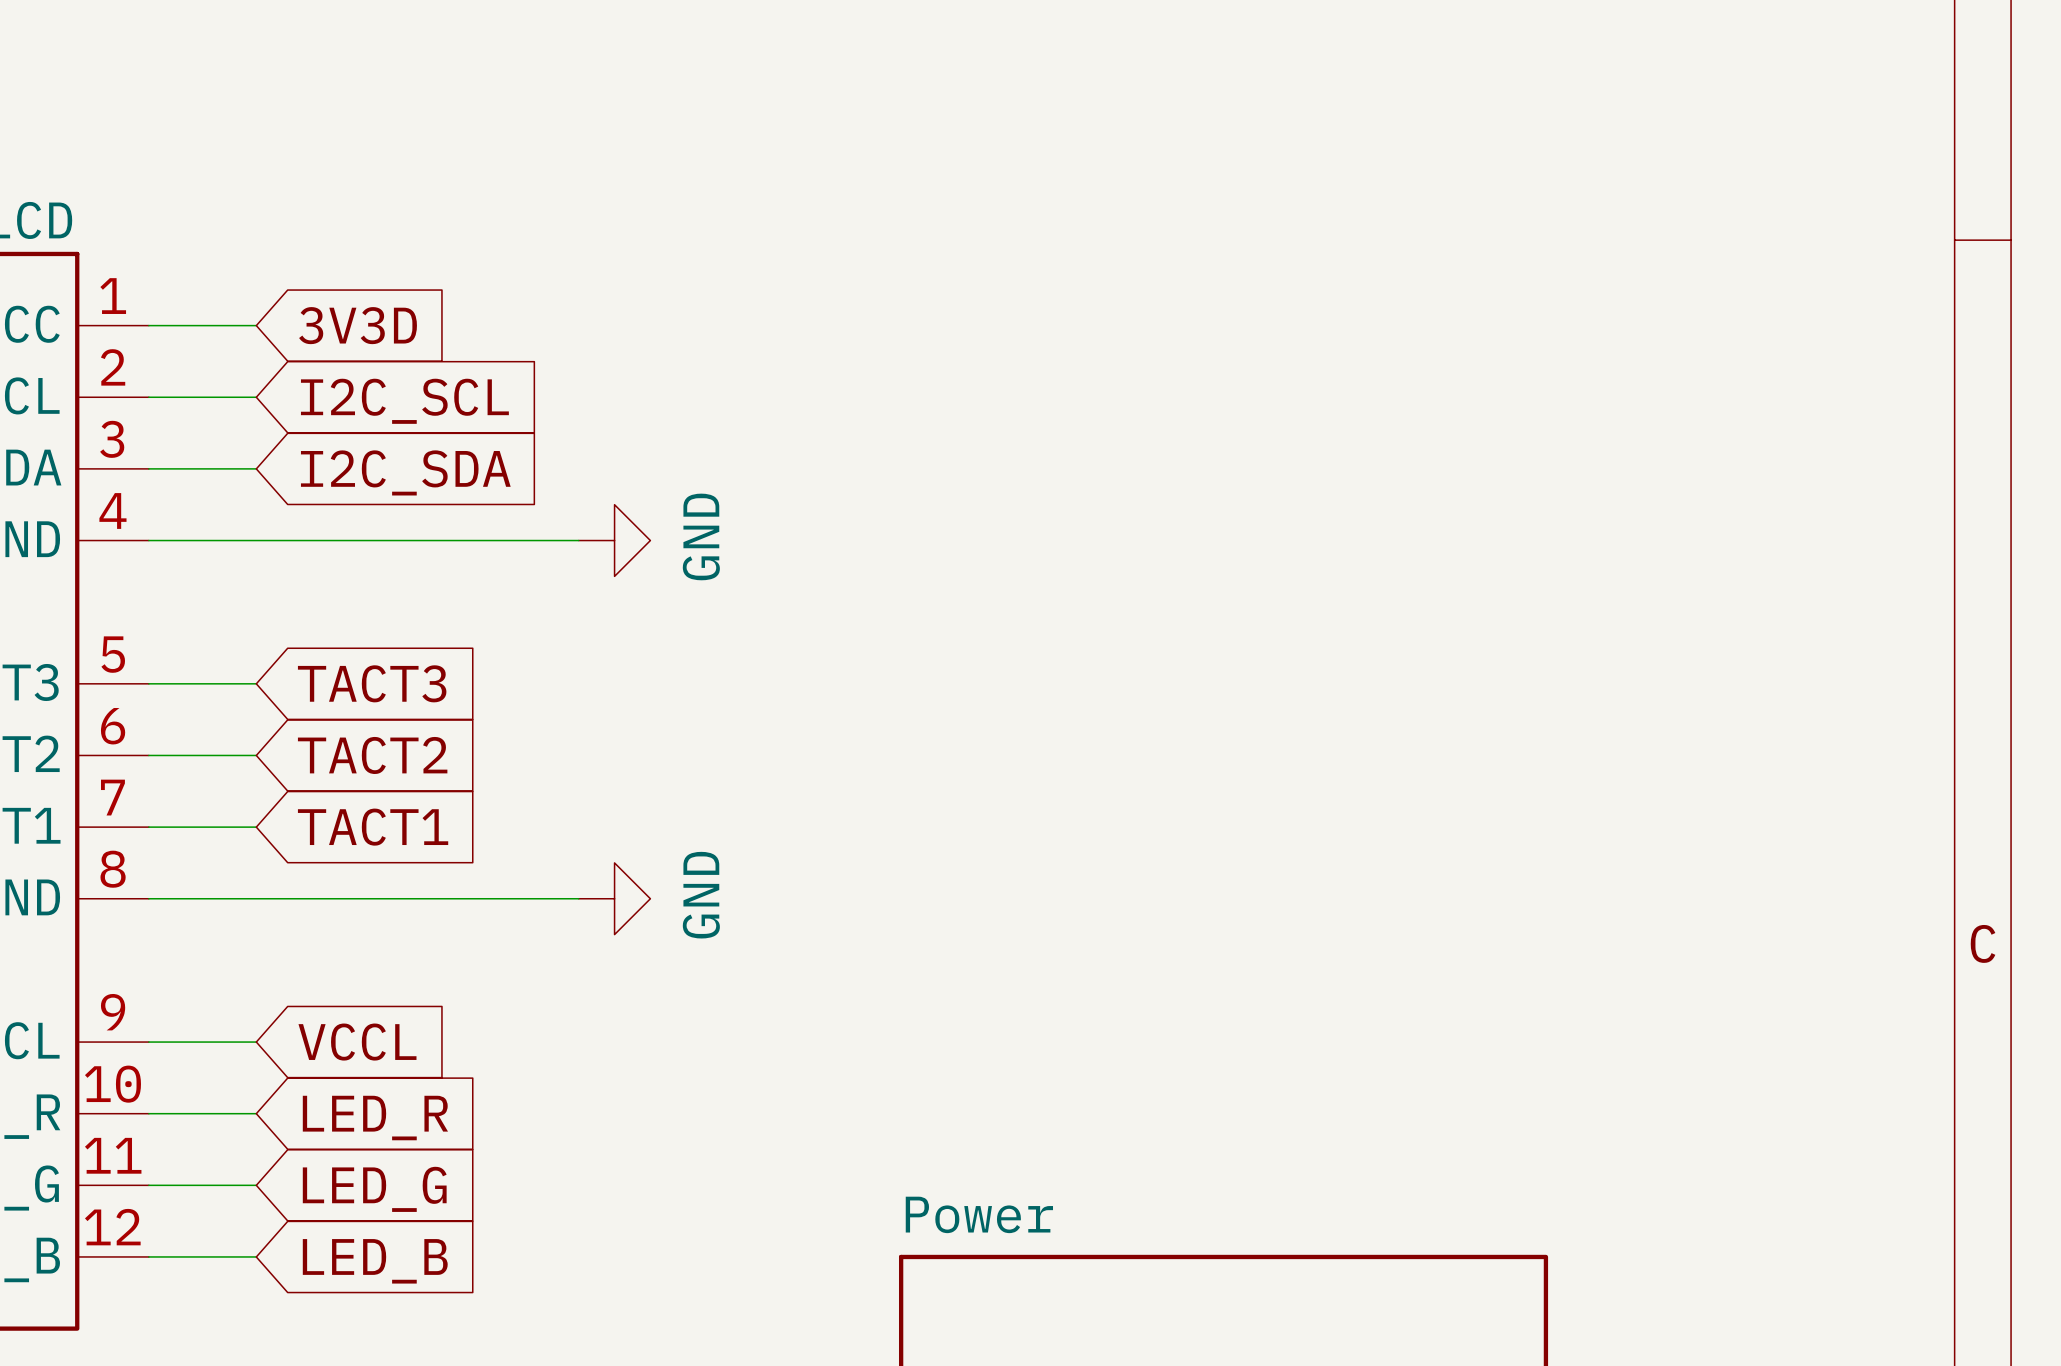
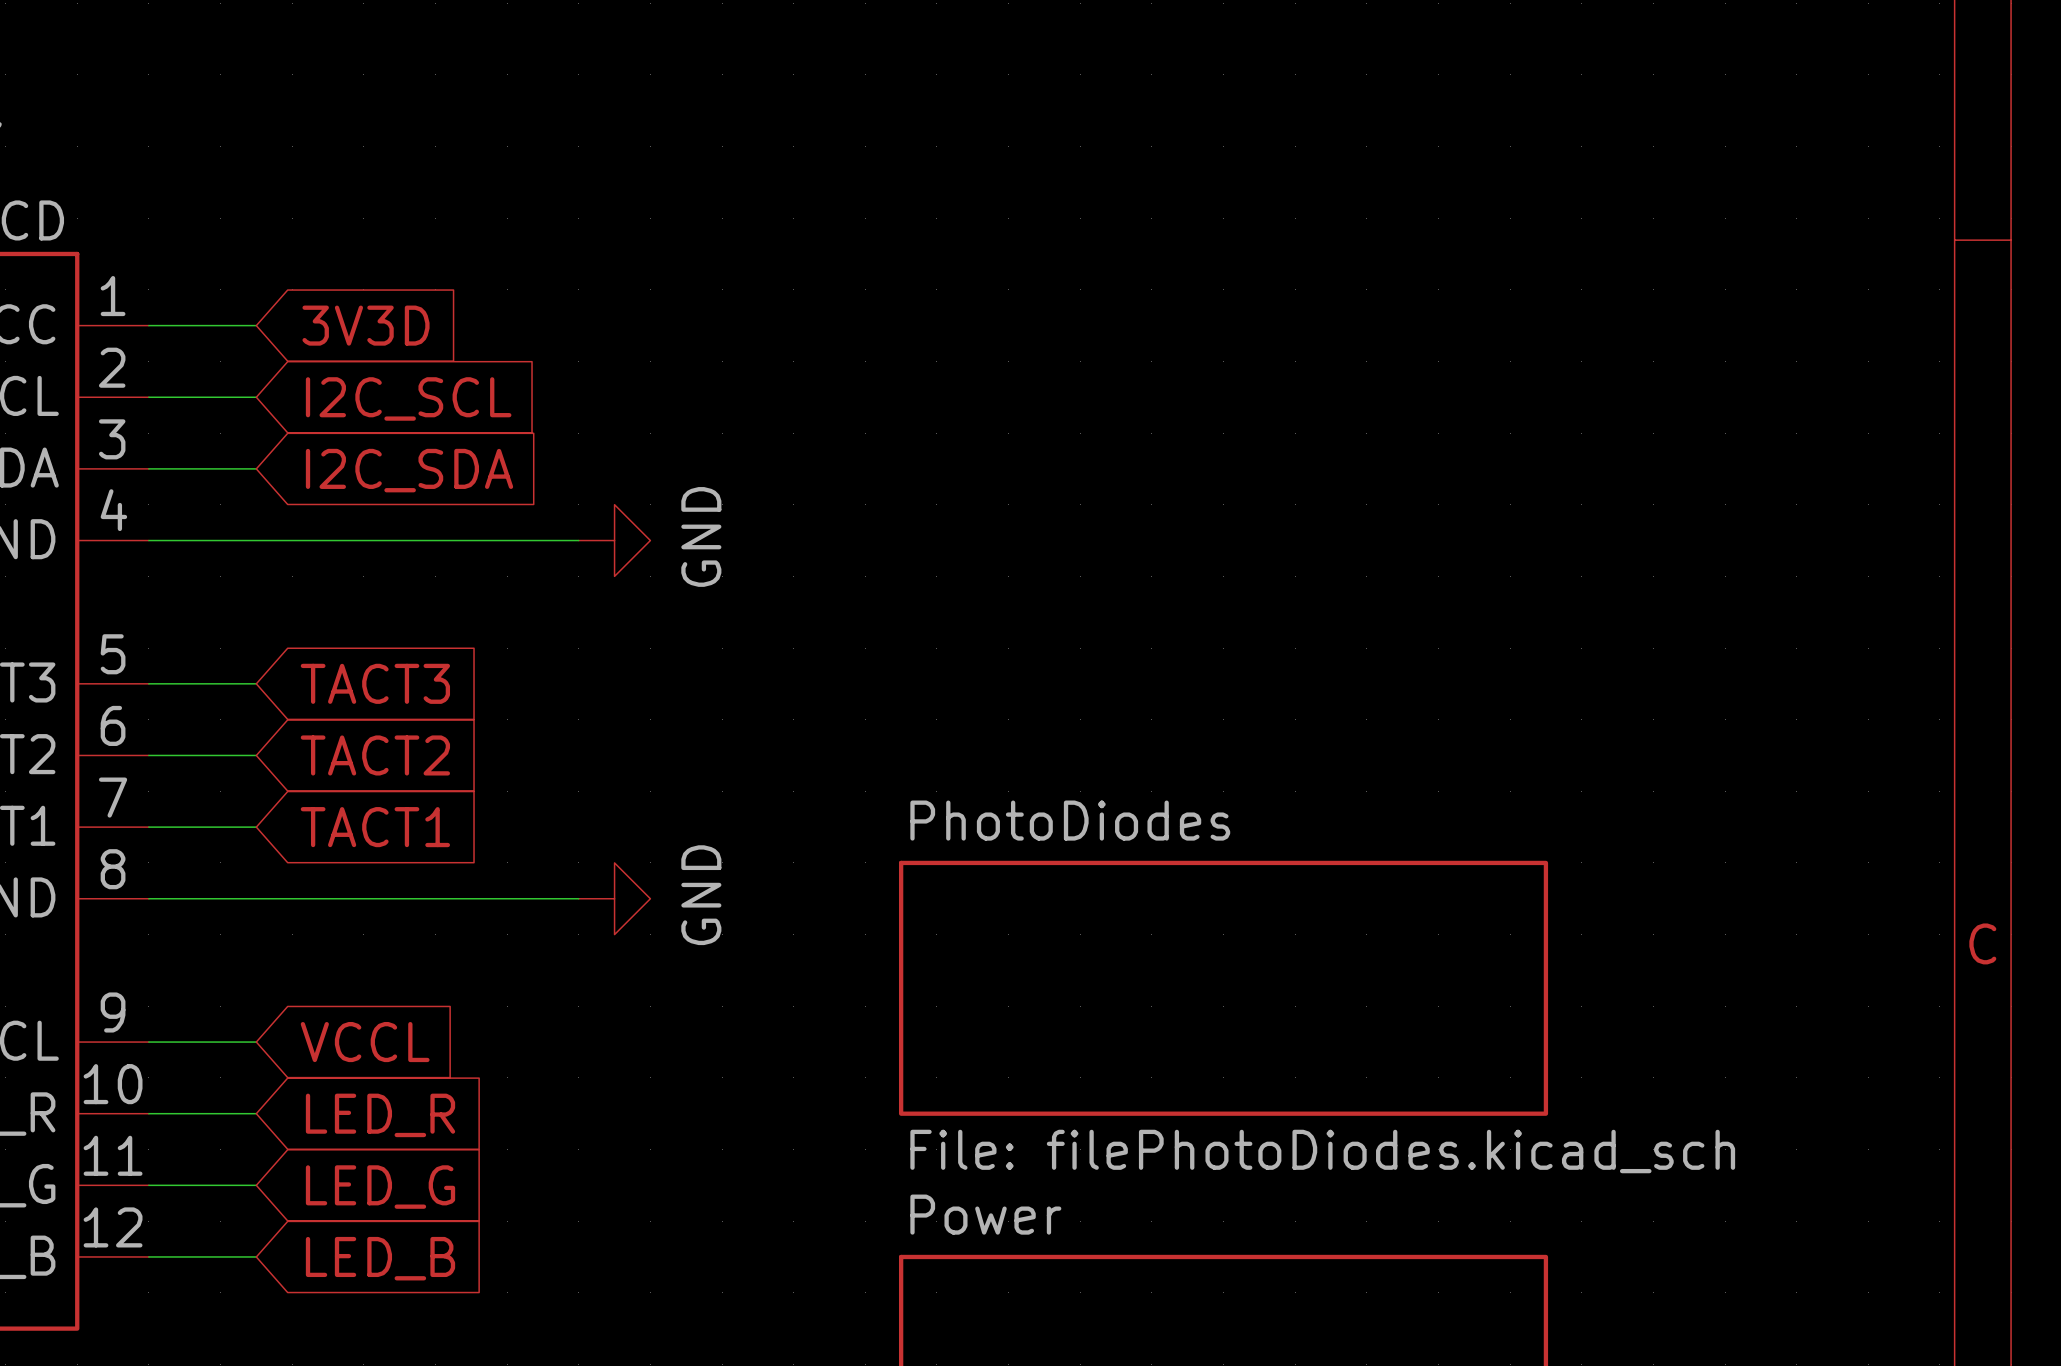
sheet PhotoDiodes: none -> File: filePhotoDiodes.kicad_sch (1223, 988)

